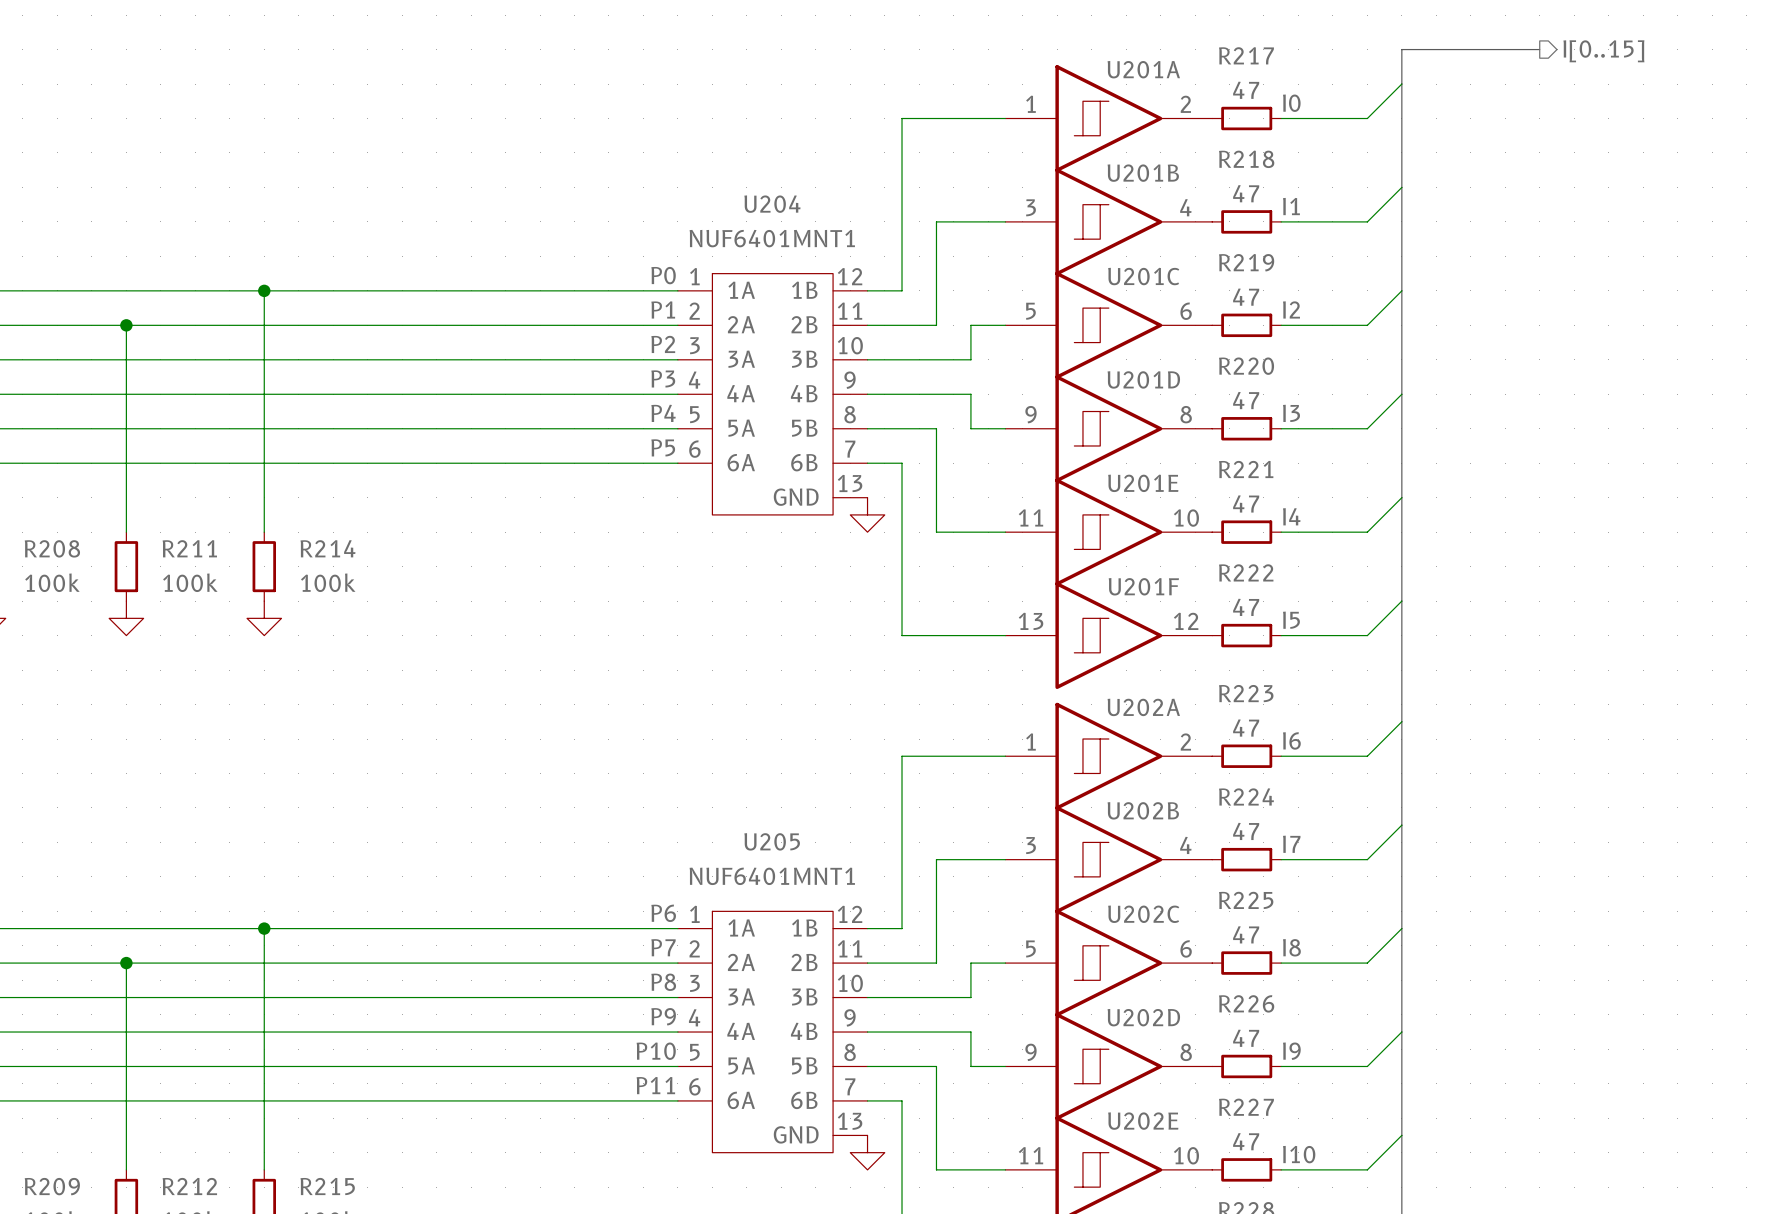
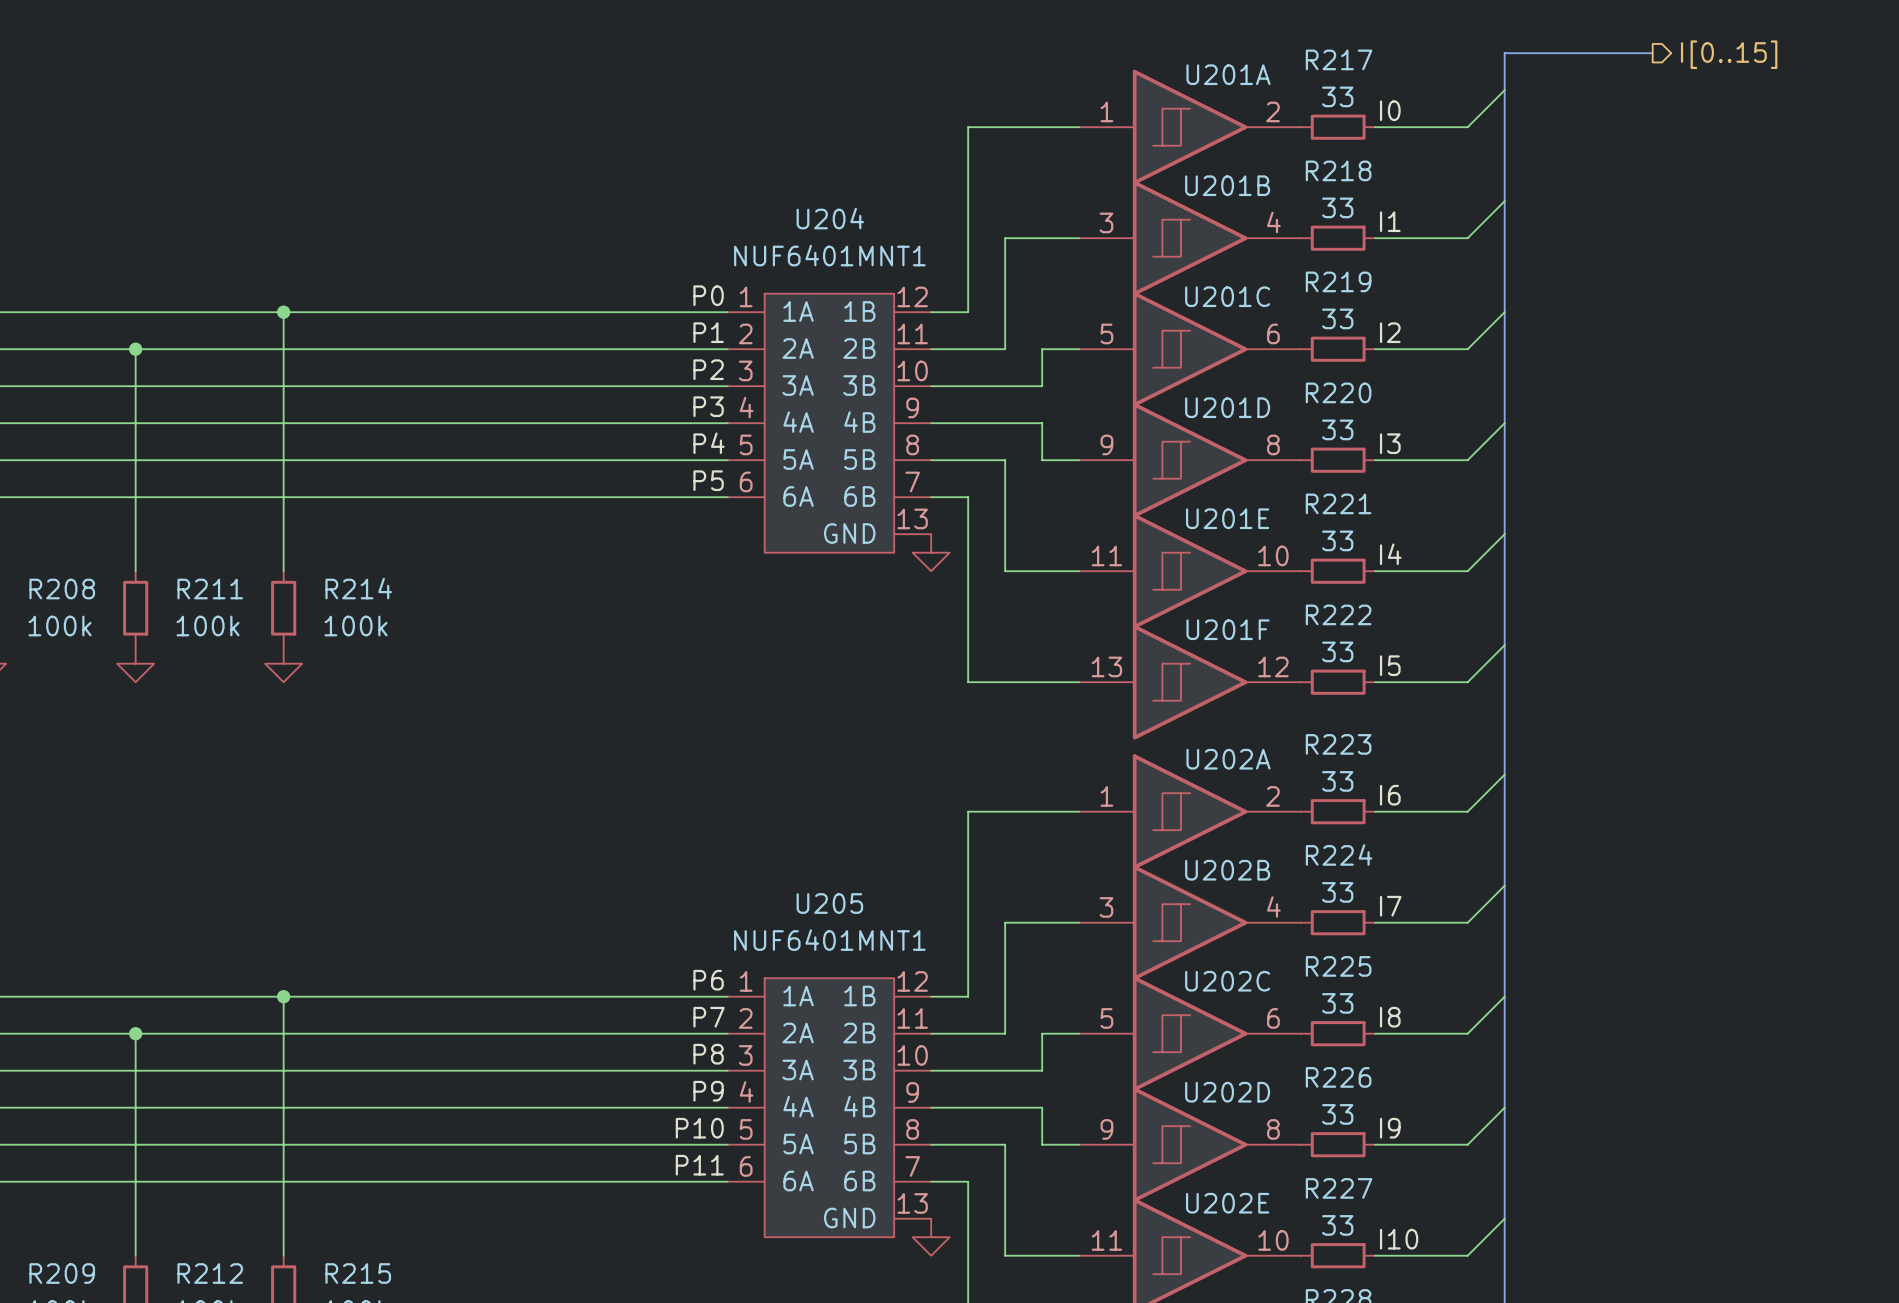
R217 value: 47 (1246, 90) -> 33 (1337, 96)
R218 value: 47 (1246, 193) -> 33 (1337, 207)
R219 value: 47 (1246, 297) -> 33 (1337, 318)
R220 value: 47 (1246, 400) -> 33 (1337, 429)
R221 value: 47 (1246, 503) -> 33 (1337, 540)
R222 value: 47 (1246, 607) -> 33 (1337, 651)
R223 value: 47 (1246, 728) -> 33 (1337, 781)
R224 value: 47 (1246, 831) -> 33 (1337, 892)
R225 value: 47 (1246, 934) -> 33 (1337, 1003)
R226 value: 47 (1246, 1038) -> 33 (1337, 1114)
R227 value: 47 (1246, 1141) -> 33 (1337, 1225)

